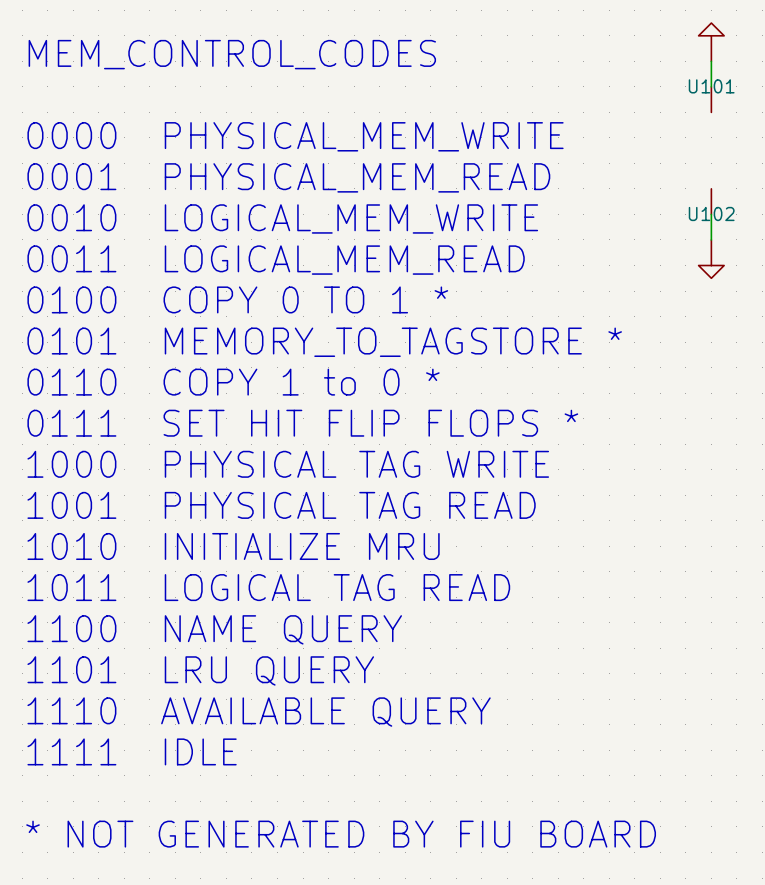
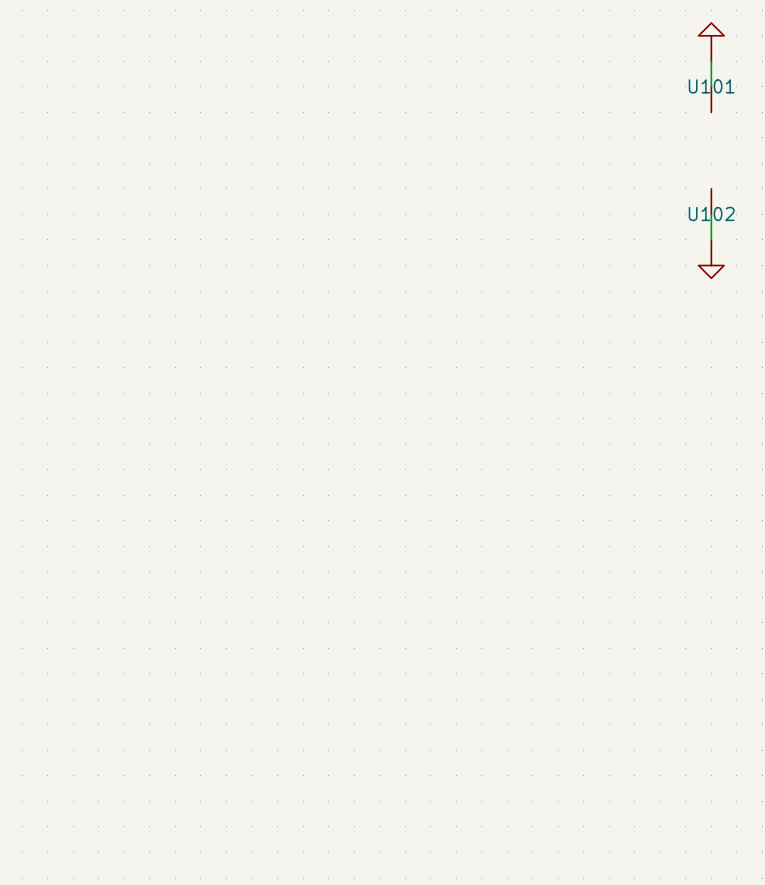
text: MEM_CONTROL_CODES (232, 54) -> none
text: 0000 PHYSICAL_MEM_WRITE (295, 136) -> none
text: 0001 PHYSICAL_MEM_READ (288, 177) -> none
text: 0010 LOGICAL_MEM_WRITE (282, 218) -> none
text: 0011 LOGICAL_MEM_READ (276, 260) -> none
text: 0100 COPY 0 TO 1 * (237, 299) -> none
text: 0101 MEMORY_TO_TAGSTORE * (324, 342) -> none
text: 0110 COPY 1 to 0 * (233, 382) -> none
text: 0111 SET HIT FLIP FLOPS * (302, 423) -> none
text: 1000 PHYSICAL TAG WRITE (288, 464) -> none
text: 1001 PHYSICAL TAG READ (281, 505) -> none
text: 1010 INITIALIZE MRU (233, 546) -> none
text: 1011 LOGICAL TAG READ (268, 587) -> none
text: 1100 NAME QUERY (214, 629) -> none
text: 1101 LRU QUERY (200, 670) -> none
text: 1110 AVAILABLE QUERY (259, 712) -> none
text: 1111 IDLE (132, 751) -> none
text: * NOT GENERATED BY FIU BOARD (341, 834) -> none

